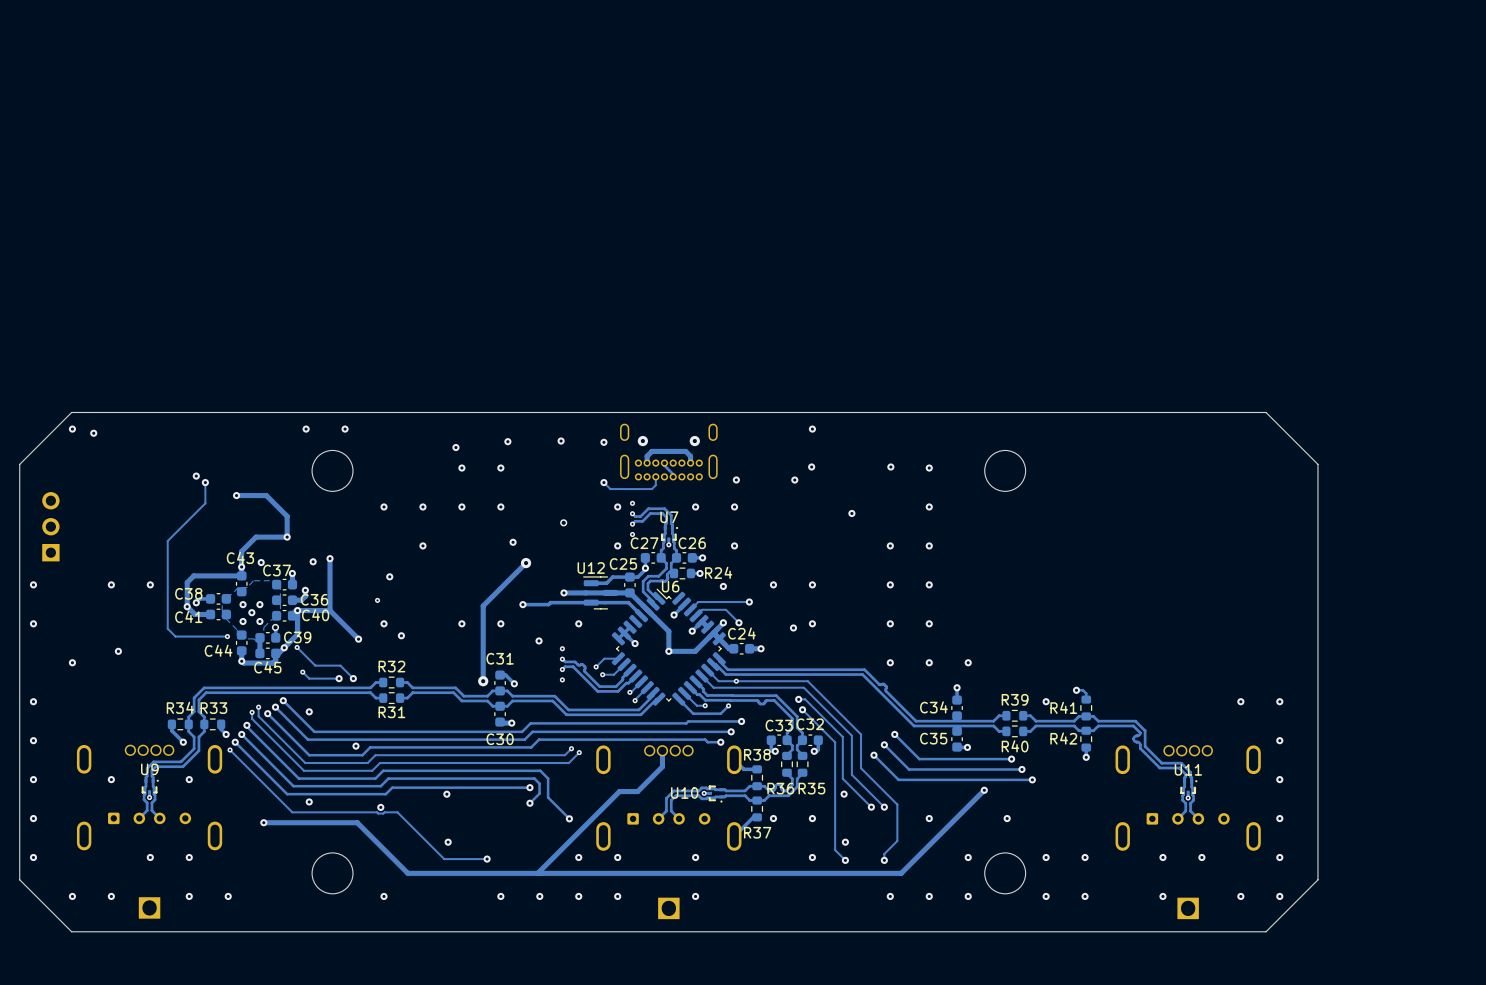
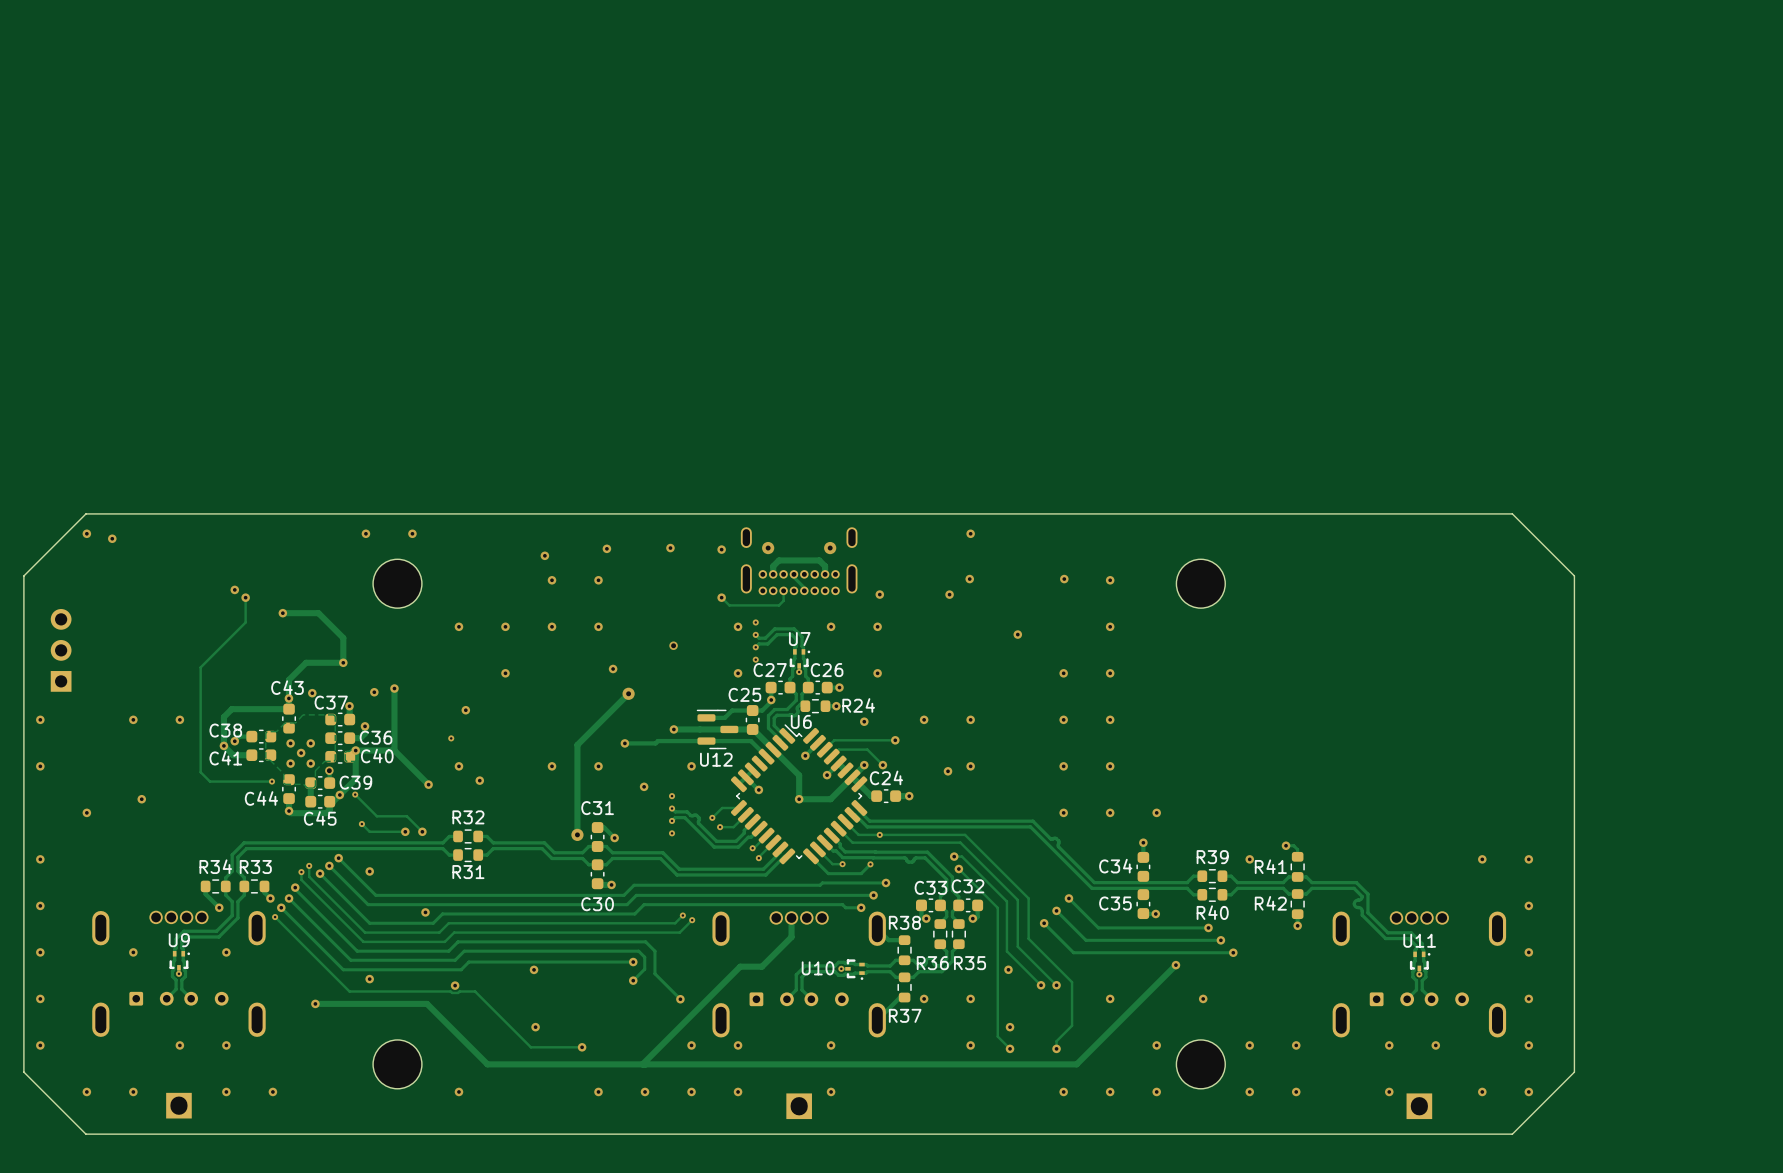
U12 name position: U12 (591, 568) -> U12 (716, 759)

